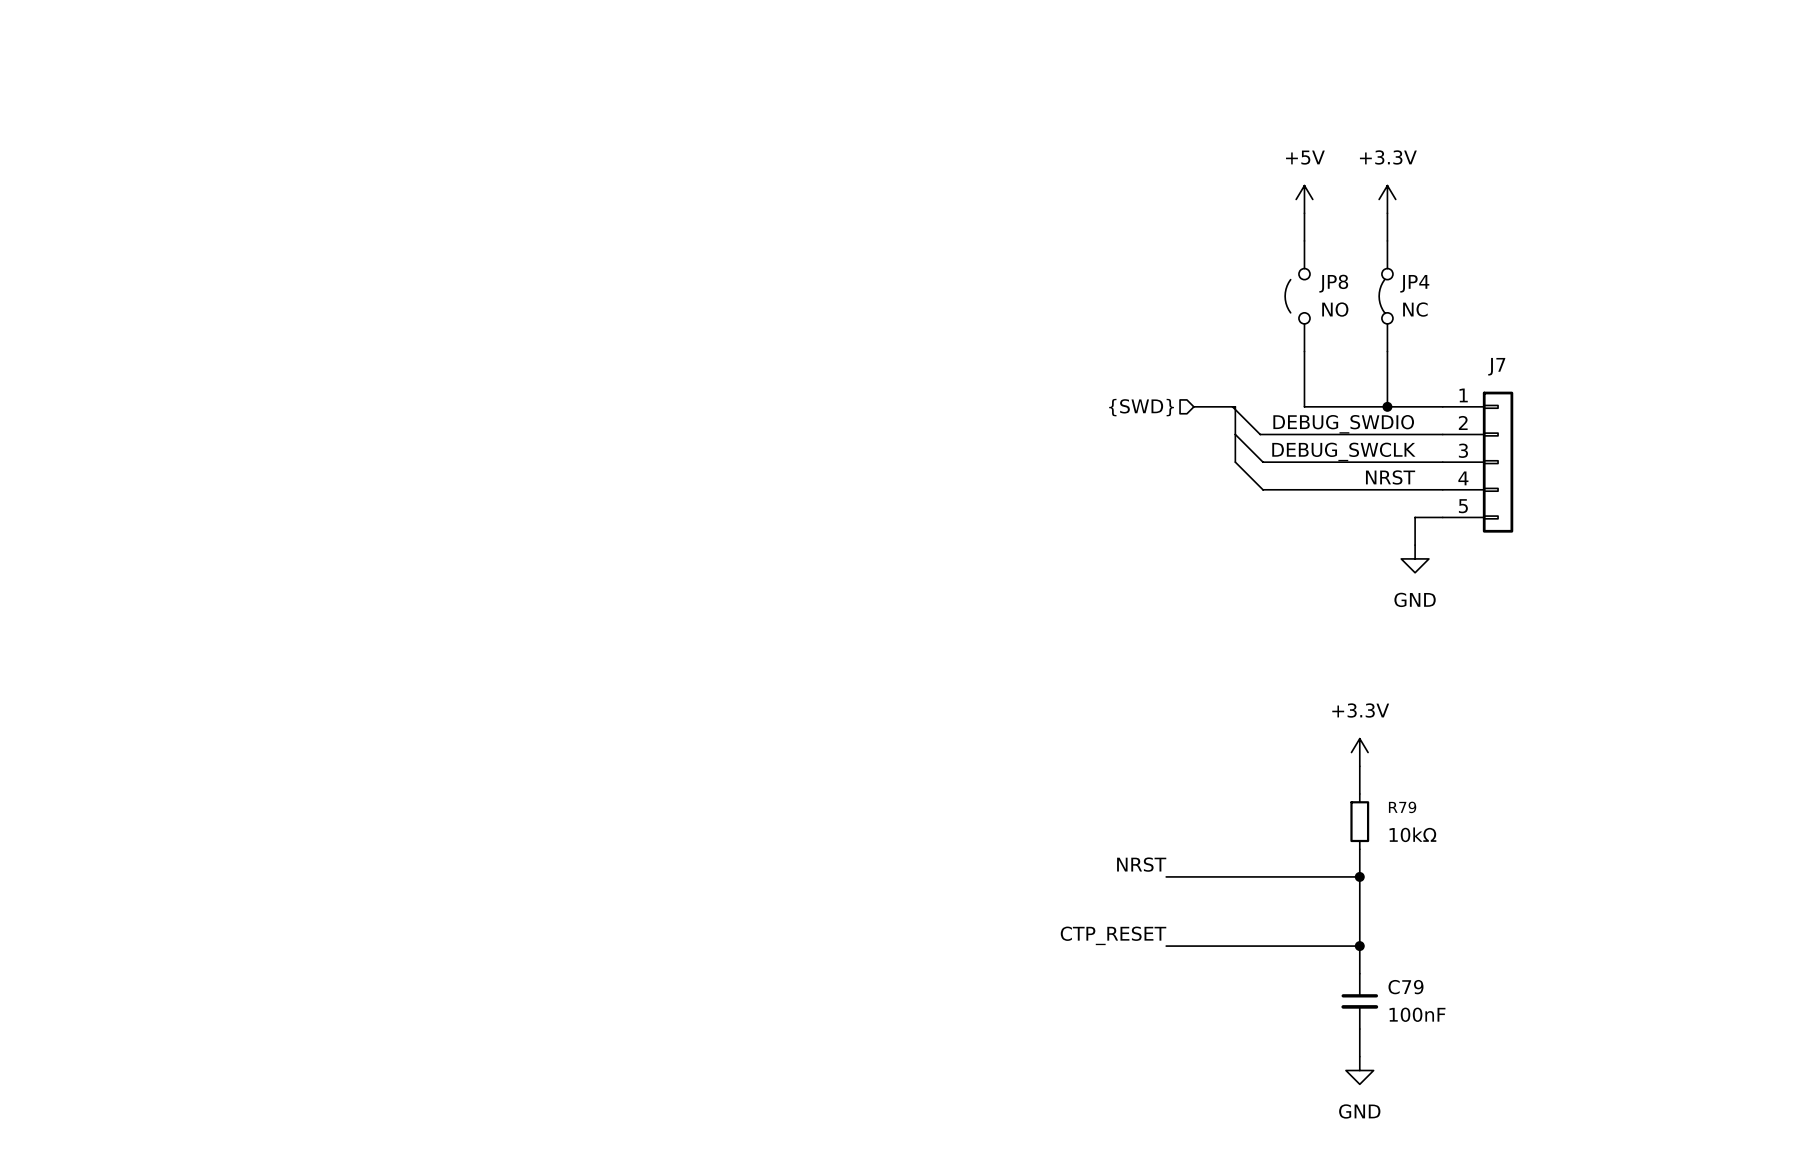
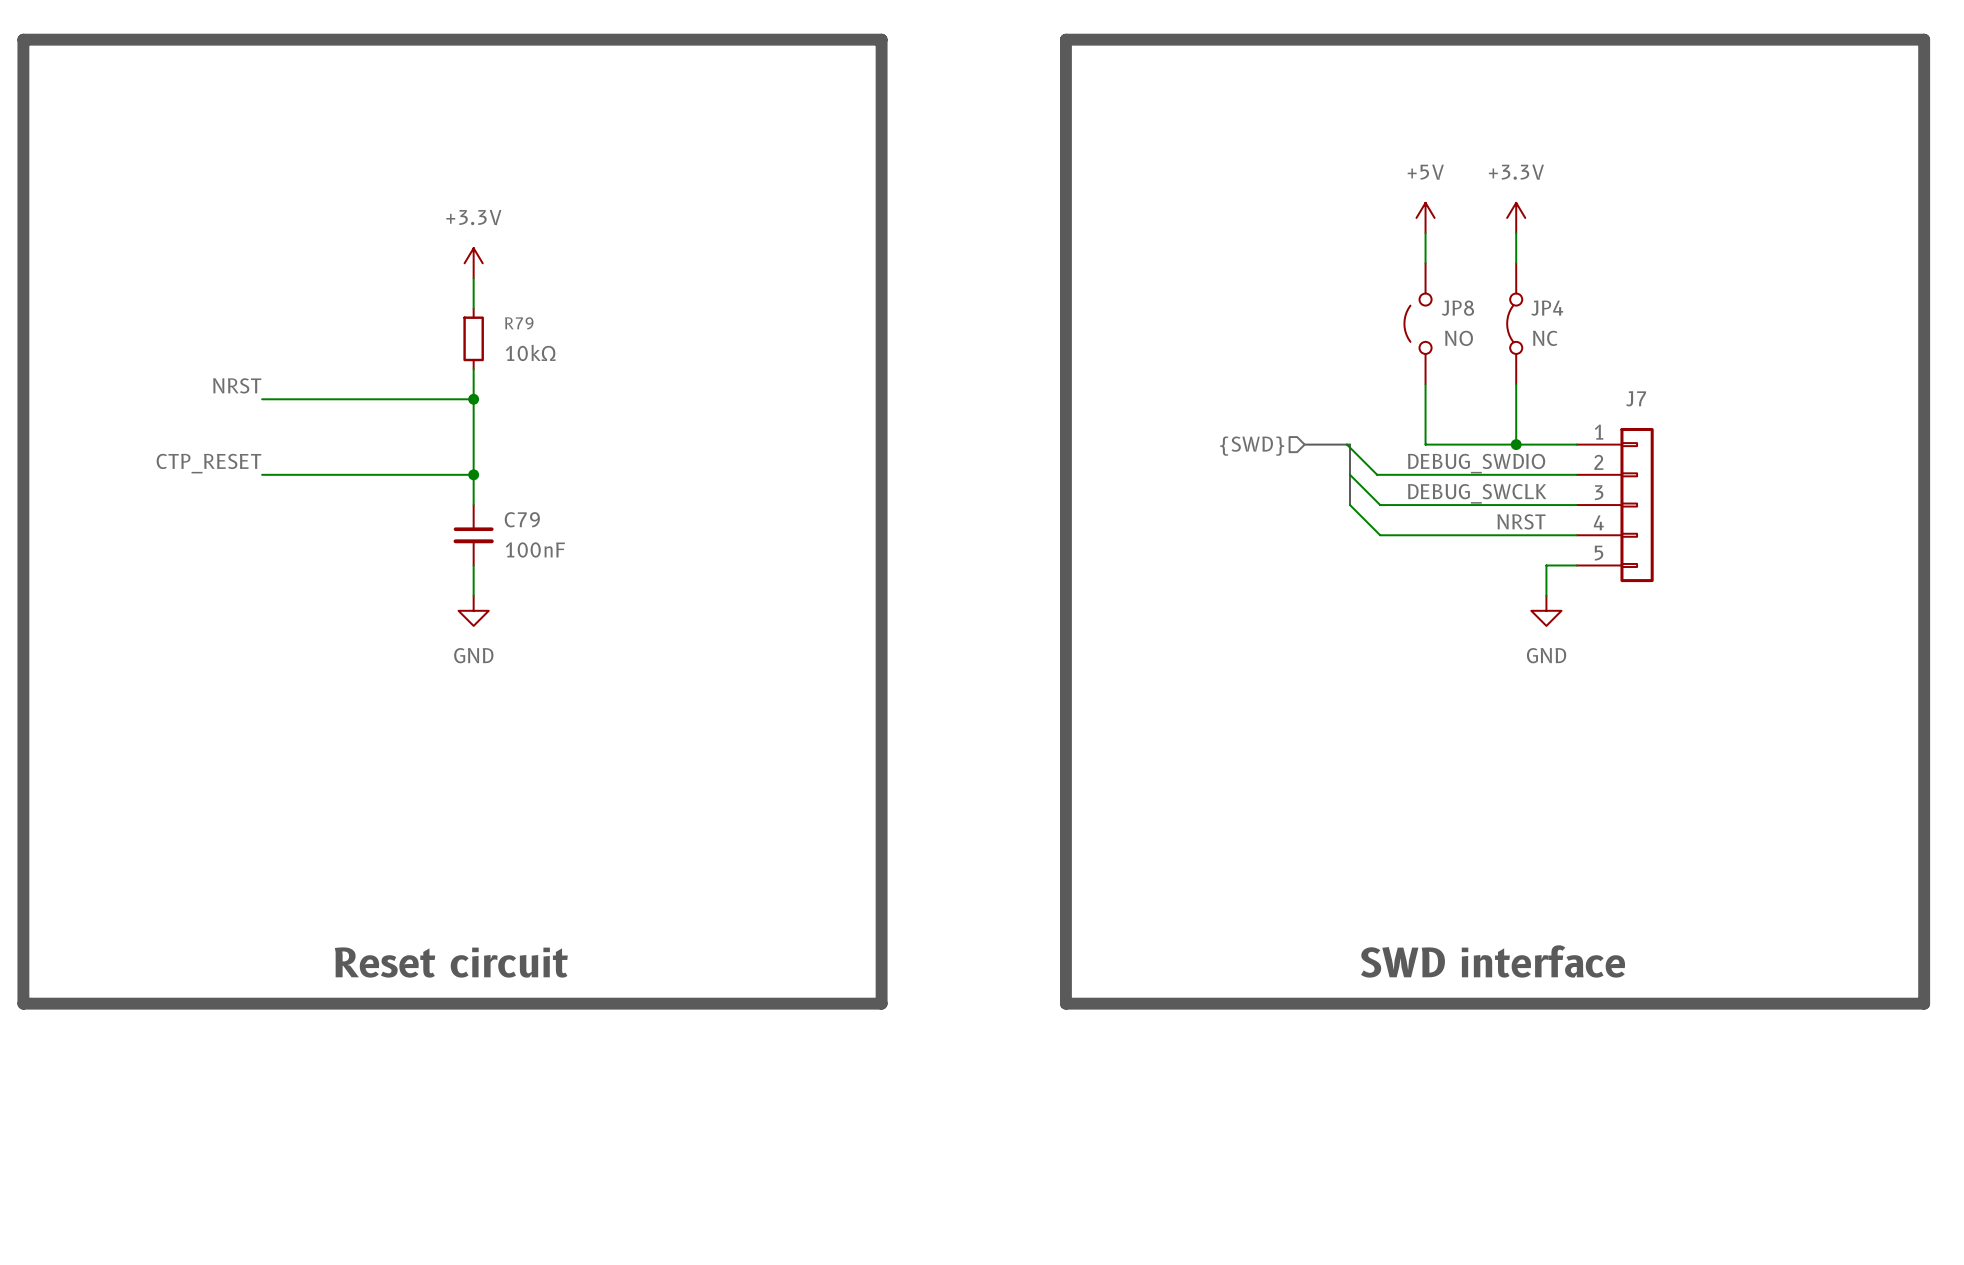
line: none -> (23, 39) (881, 39) (881, 1003) (23, 1003) (23, 39)
line: none -> (1065, 39) (1924, 39) (1924, 1003) (1065, 1003) (1065, 39)
power symbol: none -> +3.3V (473, 263)
wire: none -> (473, 278) (473, 308)
wire: none -> (473, 369) (473, 505)
label: none -> NRST (237, 385)
wire: none -> (262, 399) (473, 399)
junction: none -> (473, 399)
label: none -> CTP_RESET (208, 463)
wire: none -> (262, 474) (473, 474)
junction: none -> (473, 474)
wire: none -> (473, 565) (473, 595)
power symbol: none -> GND (473, 610)
power symbol: +3.3V (1359, 752) -> none
wire: (1359, 766) (1359, 793) -> none
R79 position: (1359, 821) -> (473, 338)
wire: (1359, 849) (1359, 973) -> none
label: NRST (1141, 864) -> none
wire: (1166, 876) (1359, 876) -> none
junction: (1359, 876) -> none
text: none -> Reset circuit (451, 962)
text: none -> SWD interface (1493, 961)
label: CTP_RESET (1113, 935) -> none
wire: (1166, 946) (1359, 946) -> none
junction: (1359, 946) -> none
C79 position: (1359, 1001) -> (473, 535)
wire: (1359, 1029) (1359, 1056) -> none
power symbol: GND (1359, 1070) -> none

